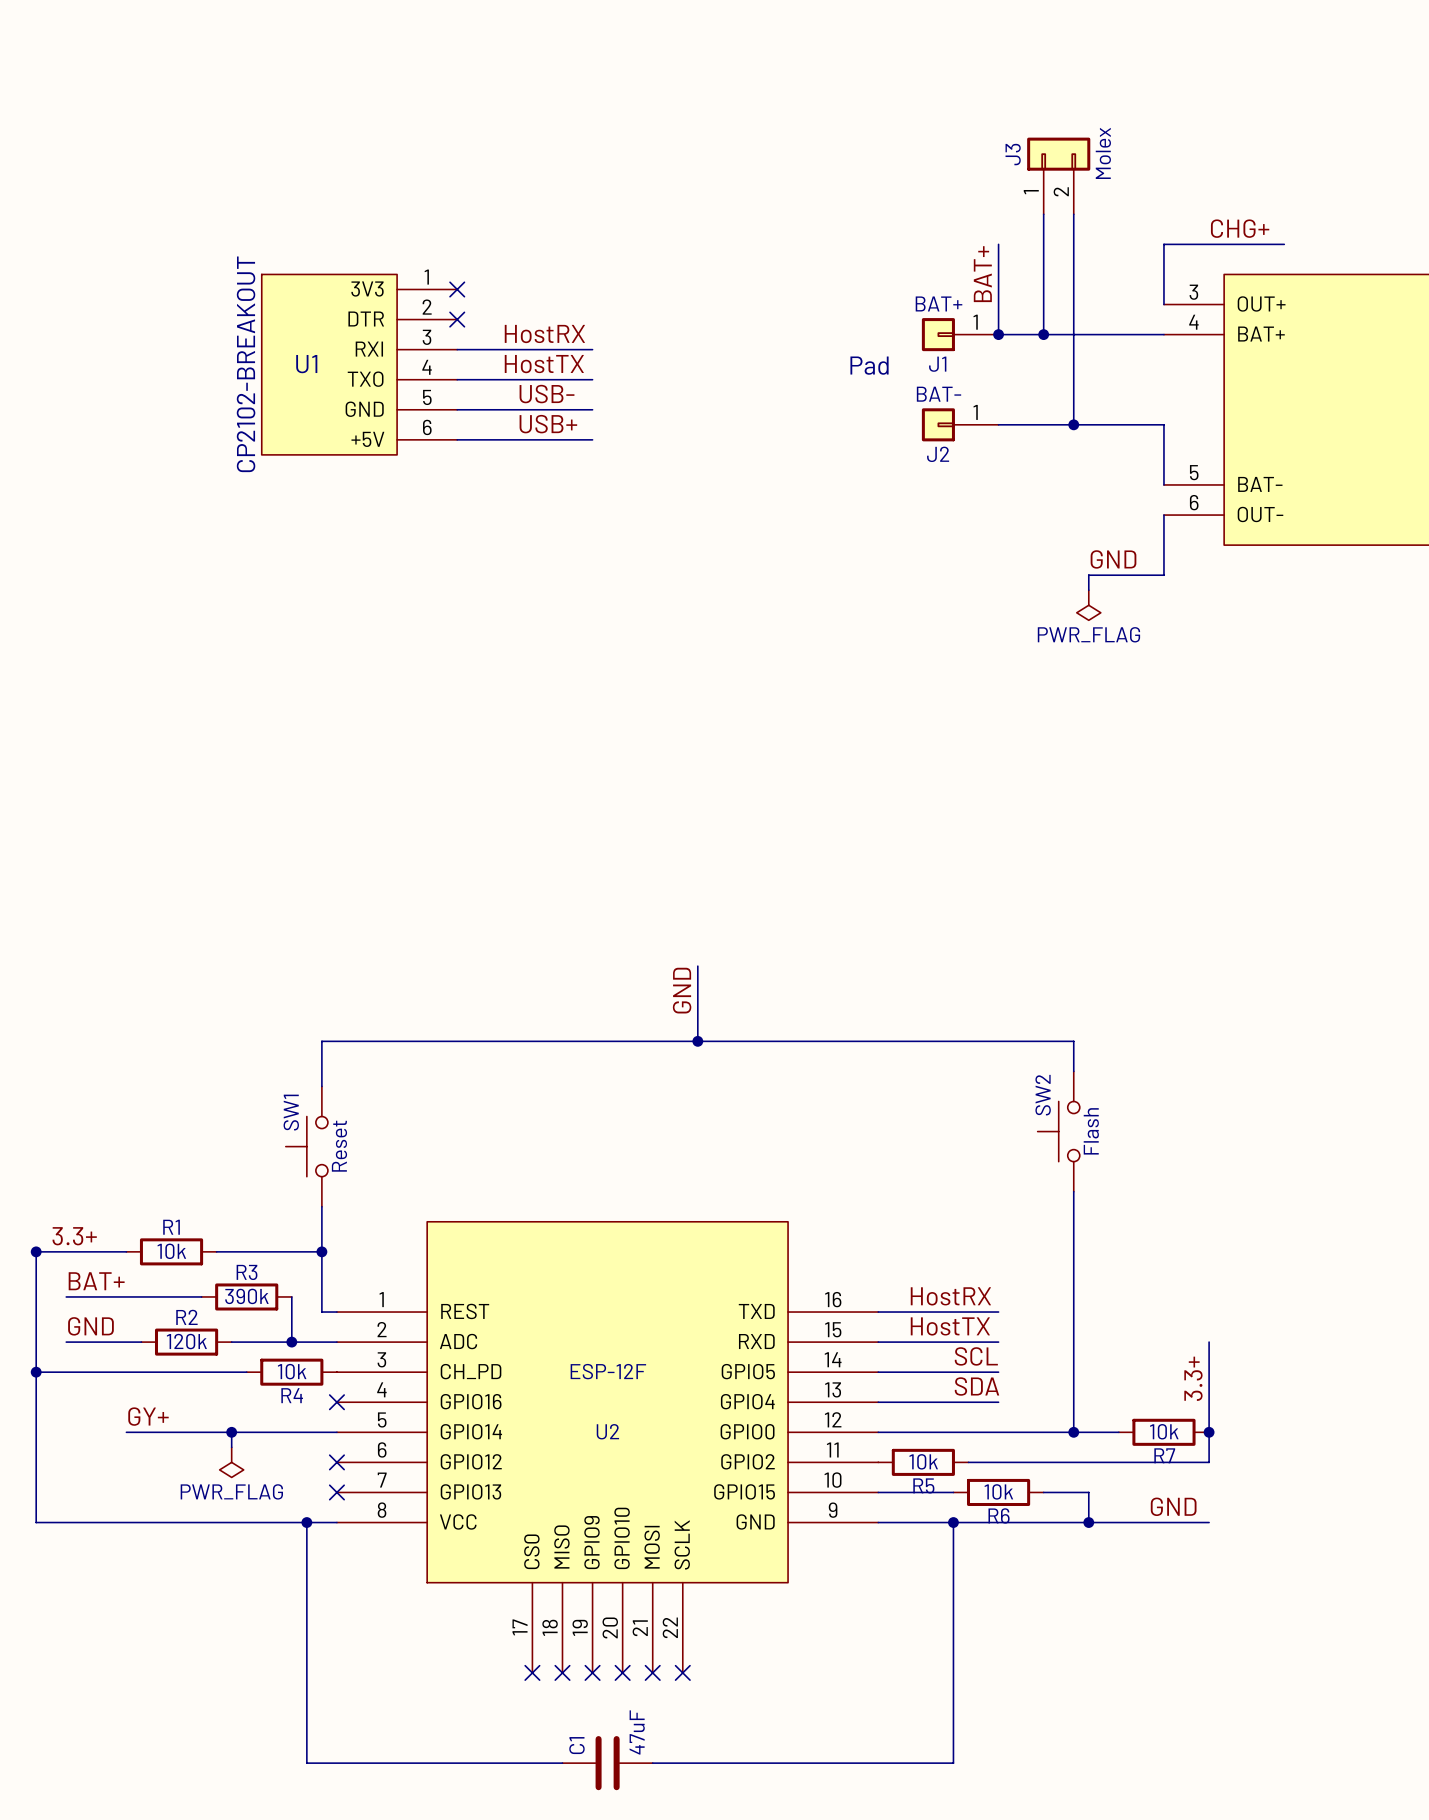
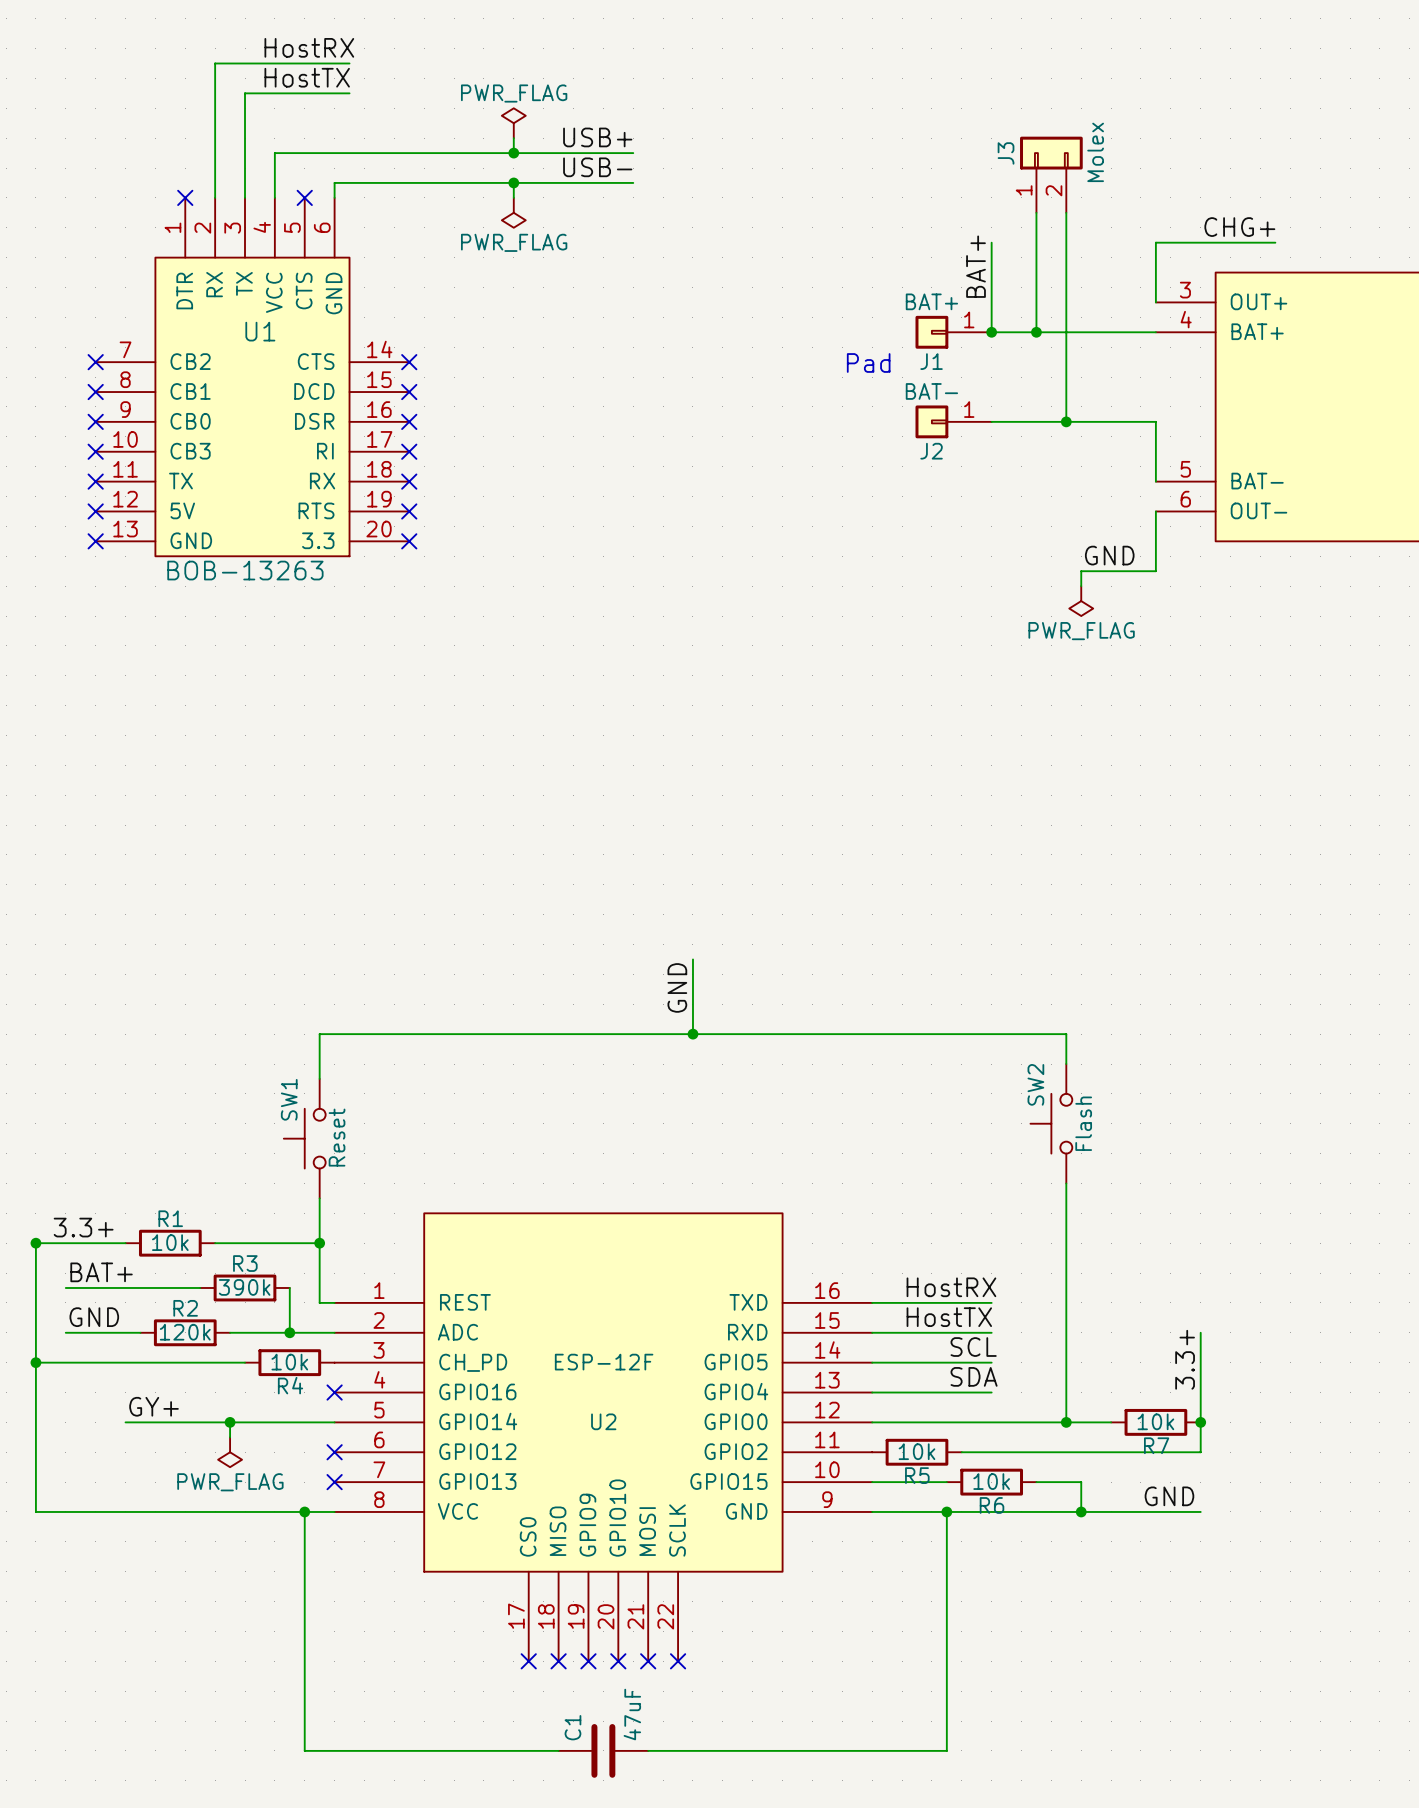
label: none -> HostRX (309, 47)
wire: none -> (349, 63) (215, 63) (215, 197)
label: none -> HostTX (307, 77)
wire: none -> (349, 93) (245, 93) (245, 197)
power symbol: none -> PWR_FLAG (513, 123)
wire: none -> (513, 138) (513, 153)
junction: none -> (513, 153)
wire: none -> (633, 153) (274, 153) (274, 197)
wire: none -> (513, 182) (513, 197)
junction: none -> (513, 182)
wire: none -> (633, 182) (334, 182) (334, 197)
no-connect mark: none -> (185, 197)
no-connect mark: none -> (304, 197)
power symbol: none -> PWR_FLAG (513, 212)
U1 symbol: [261, 274, 458, 455] -> [95, 197, 410, 557]
no-connect mark: (457, 289) -> none
no-connect mark: (457, 319) -> none
label: HostRX (544, 334) -> none
wire: (457, 349) (592, 349) -> none
no-connect mark: none -> (95, 362)
U1 value: CP2102-BREAKOUT (246, 364) -> BOB-13263 (245, 570)
U1 name position: U1 (306, 364) -> U1 (260, 331)
no-connect mark: none -> (409, 362)
label: HostTX (544, 364) -> none
wire: (457, 379) (592, 379) -> none
no-connect mark: none -> (95, 392)
no-connect mark: none -> (409, 392)
label position: USB- (547, 394) -> USB- (597, 167)
wire: (457, 409) (592, 409) -> none
no-connect mark: none -> (95, 421)
no-connect mark: none -> (409, 421)
label position: USB+ (548, 424) -> USB+ (597, 137)
wire: (457, 439) (592, 439) -> none
no-connect mark: none -> (95, 451)
no-connect mark: none -> (409, 451)
no-connect mark: none -> (95, 481)
no-connect mark: none -> (409, 481)
no-connect mark: none -> (95, 511)
no-connect mark: none -> (409, 511)
no-connect mark: none -> (95, 541)
no-connect mark: none -> (409, 541)

